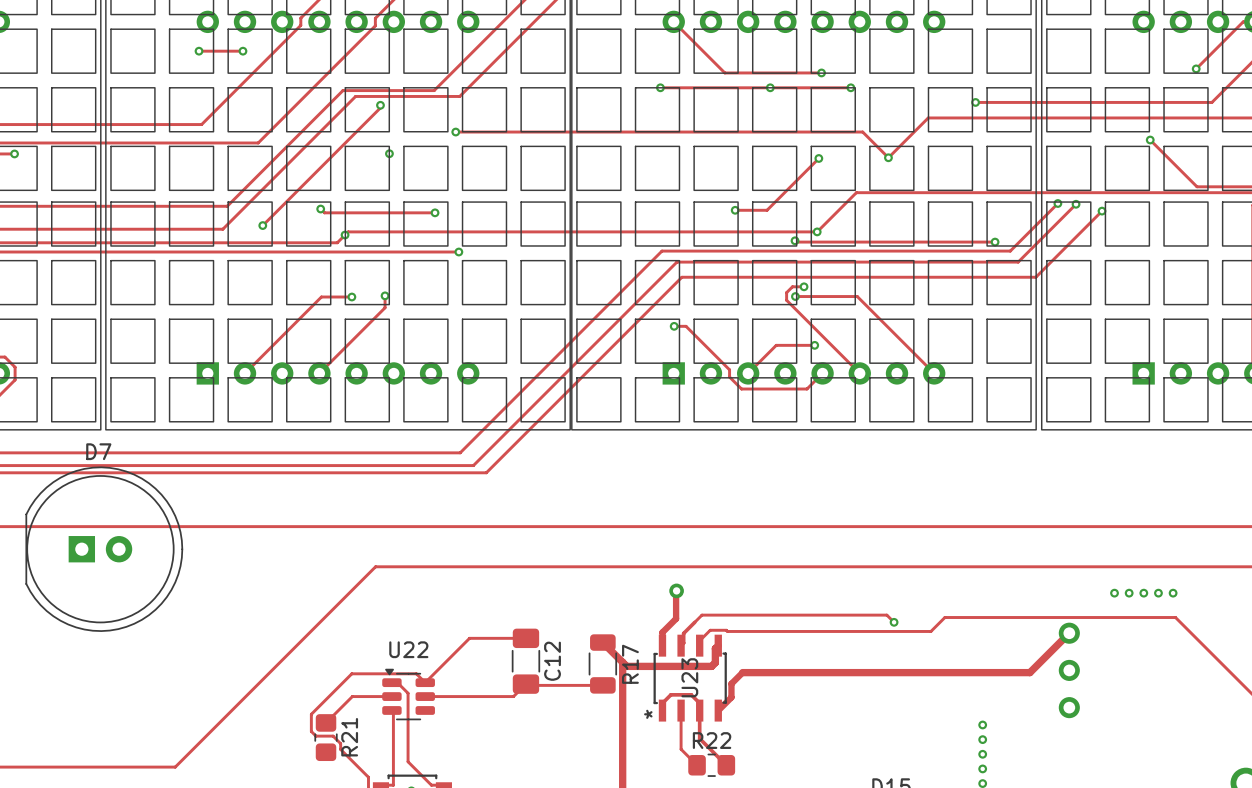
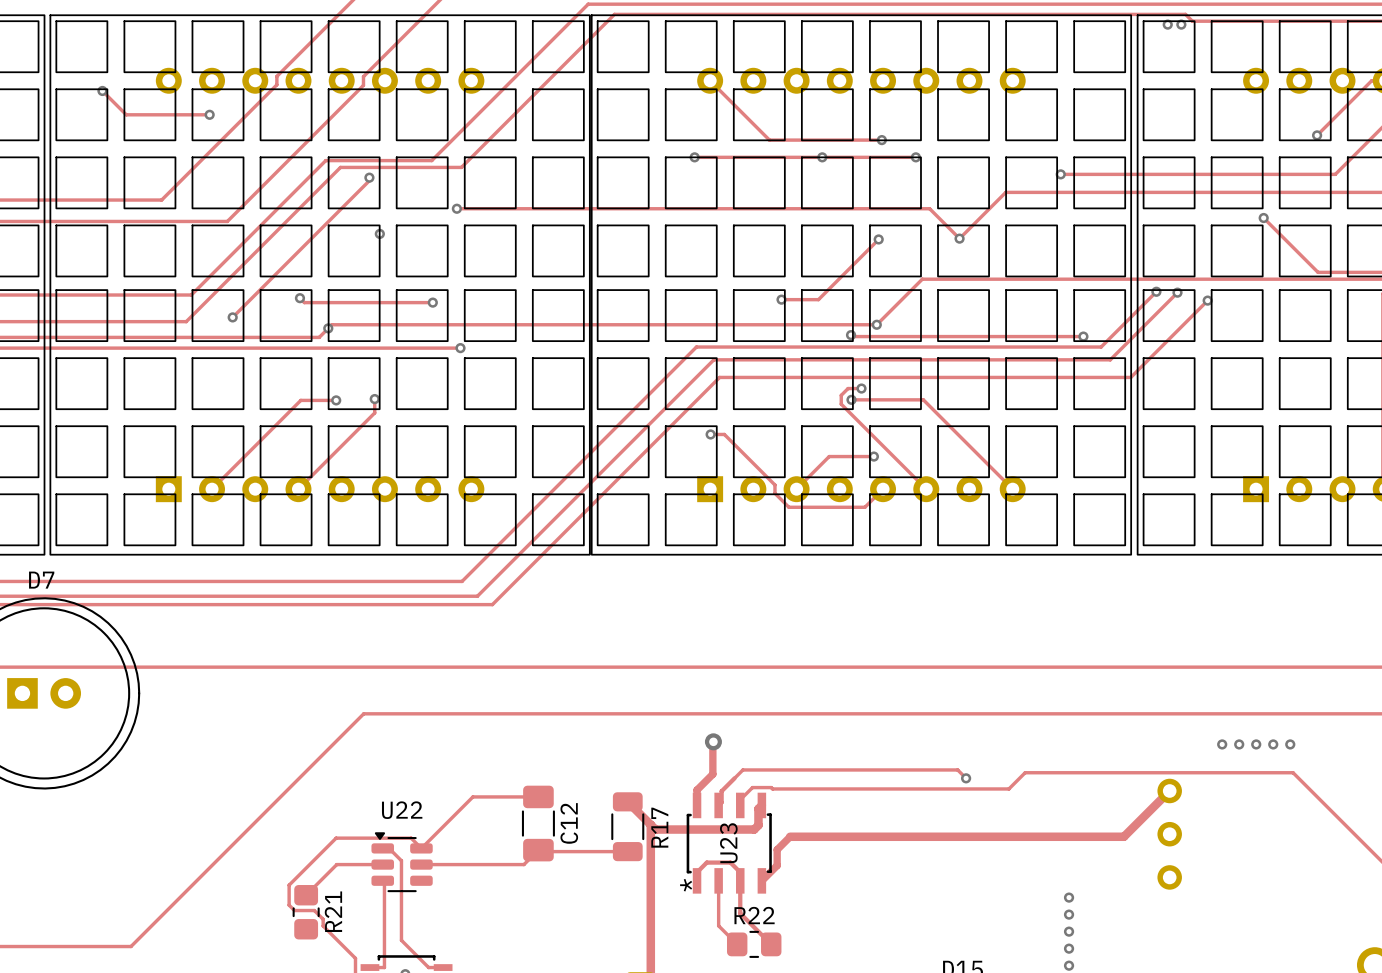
track: none -> (102, 90) (126, 114) (158, 114)
via position: (199, 51) -> (102, 90)

